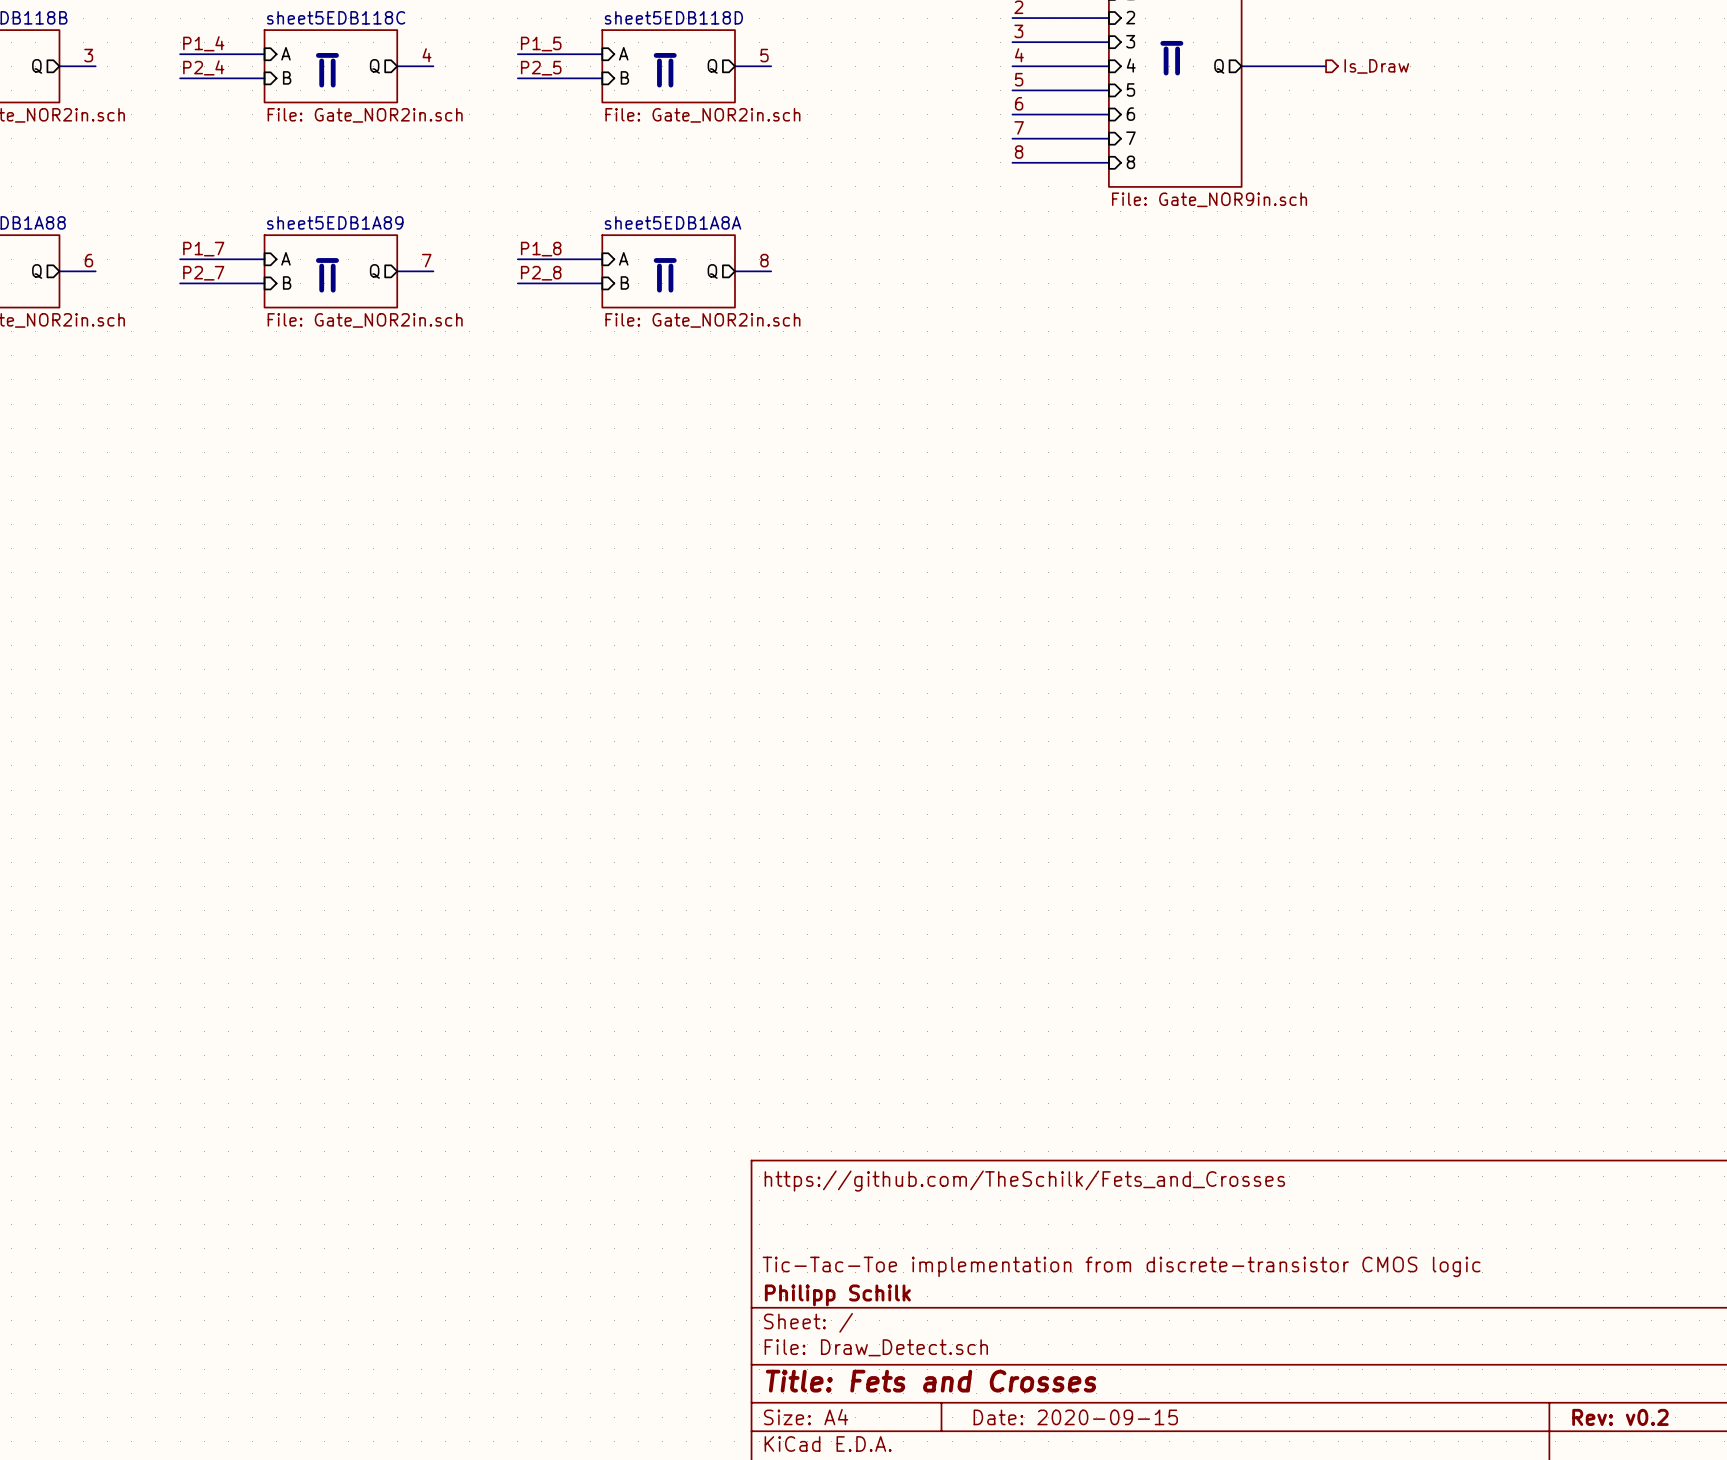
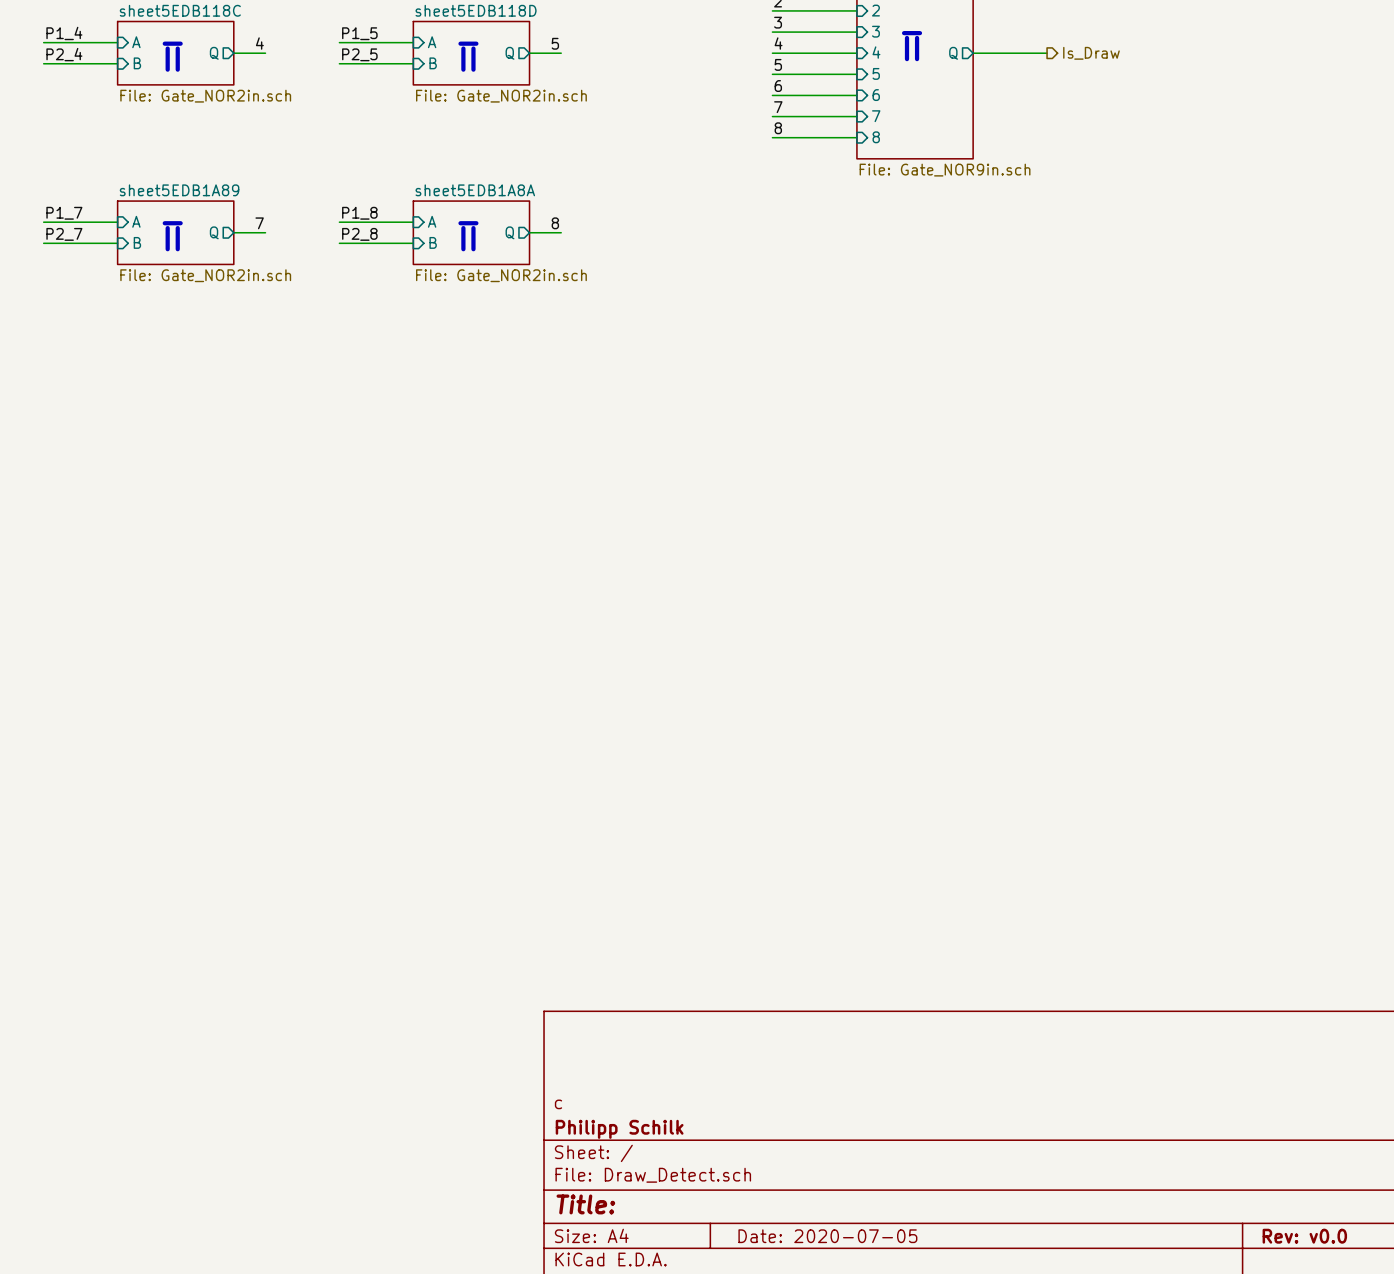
title block: https://github.com/TheSchilk/Fets_and_Crosses (1024, 1181) -> none
title block: Tic-Tac-Toe implementation from discrete-transistor CMOS logic (1121, 1266) -> c (558, 1104)
title block: Title: Fets and Crosses (930, 1381) -> Title: (585, 1204)
title block: Date: 2020-09-15 (1075, 1417) -> Date: 2020-07-05 (827, 1236)
title block: Rev: v0.2 (1620, 1417) -> Rev: v0.0 (1304, 1236)

